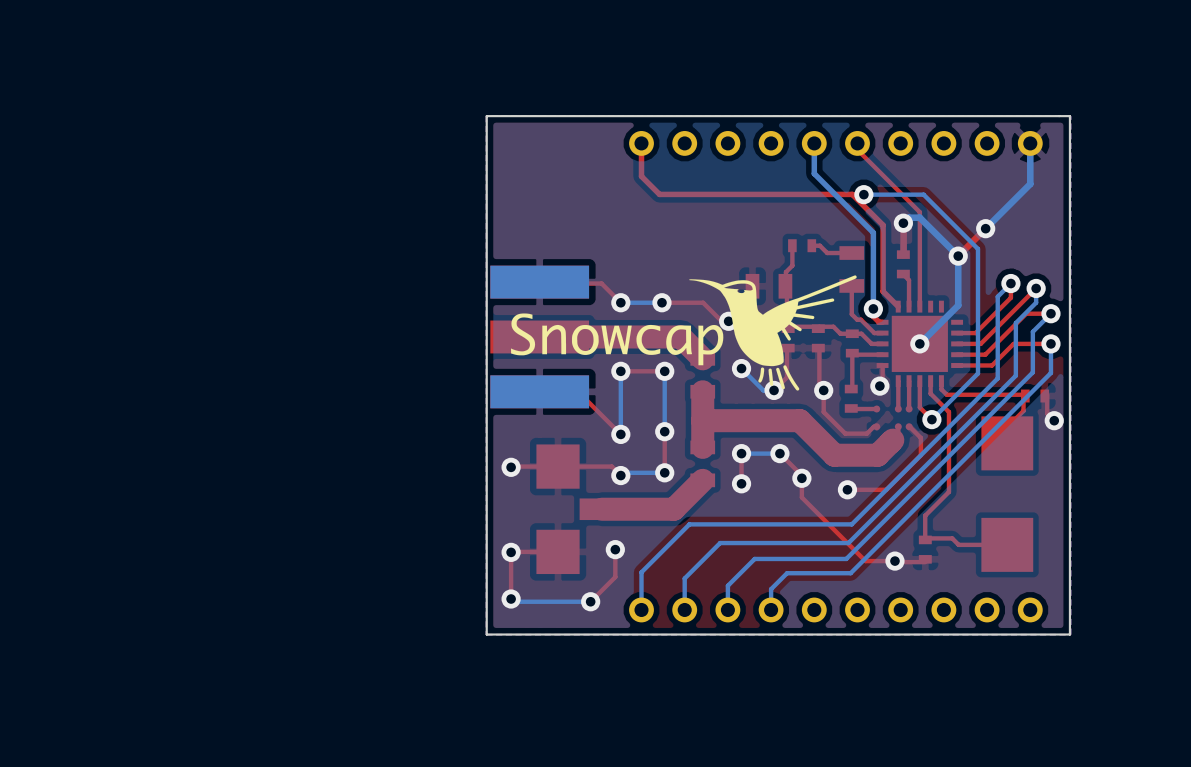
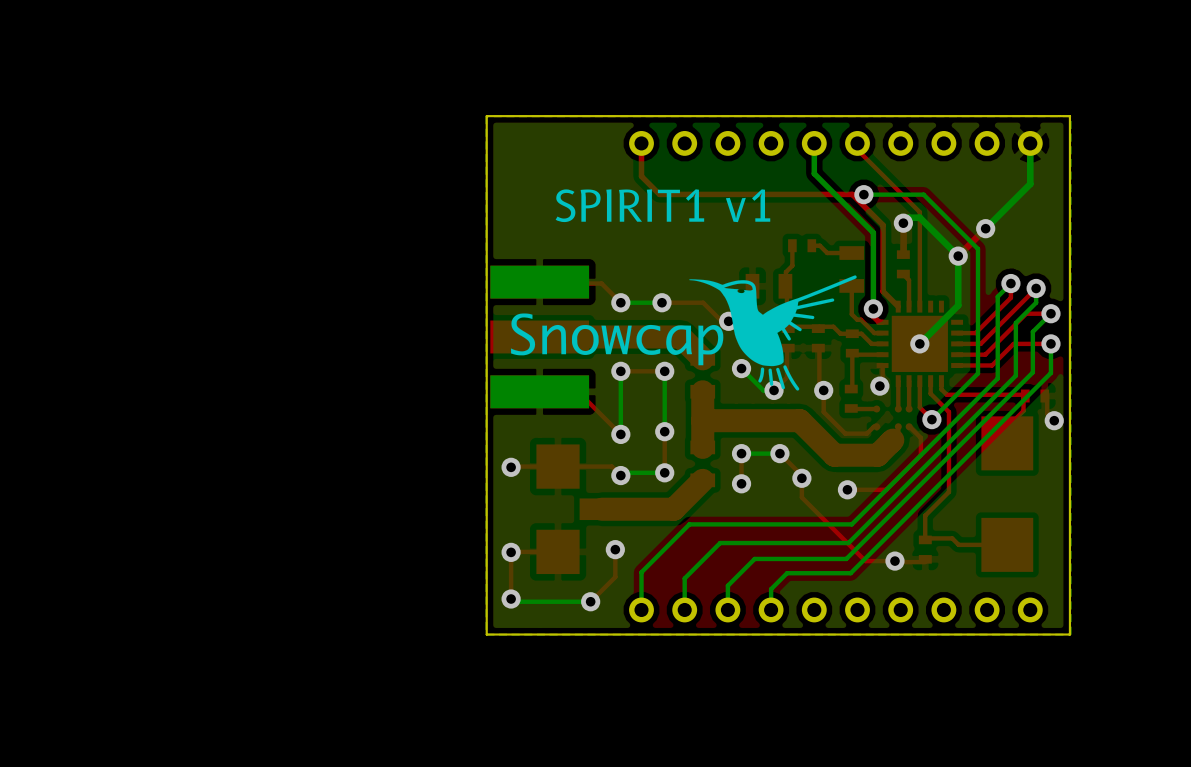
text: none -> SPIRIT1 v1 (662, 205)

